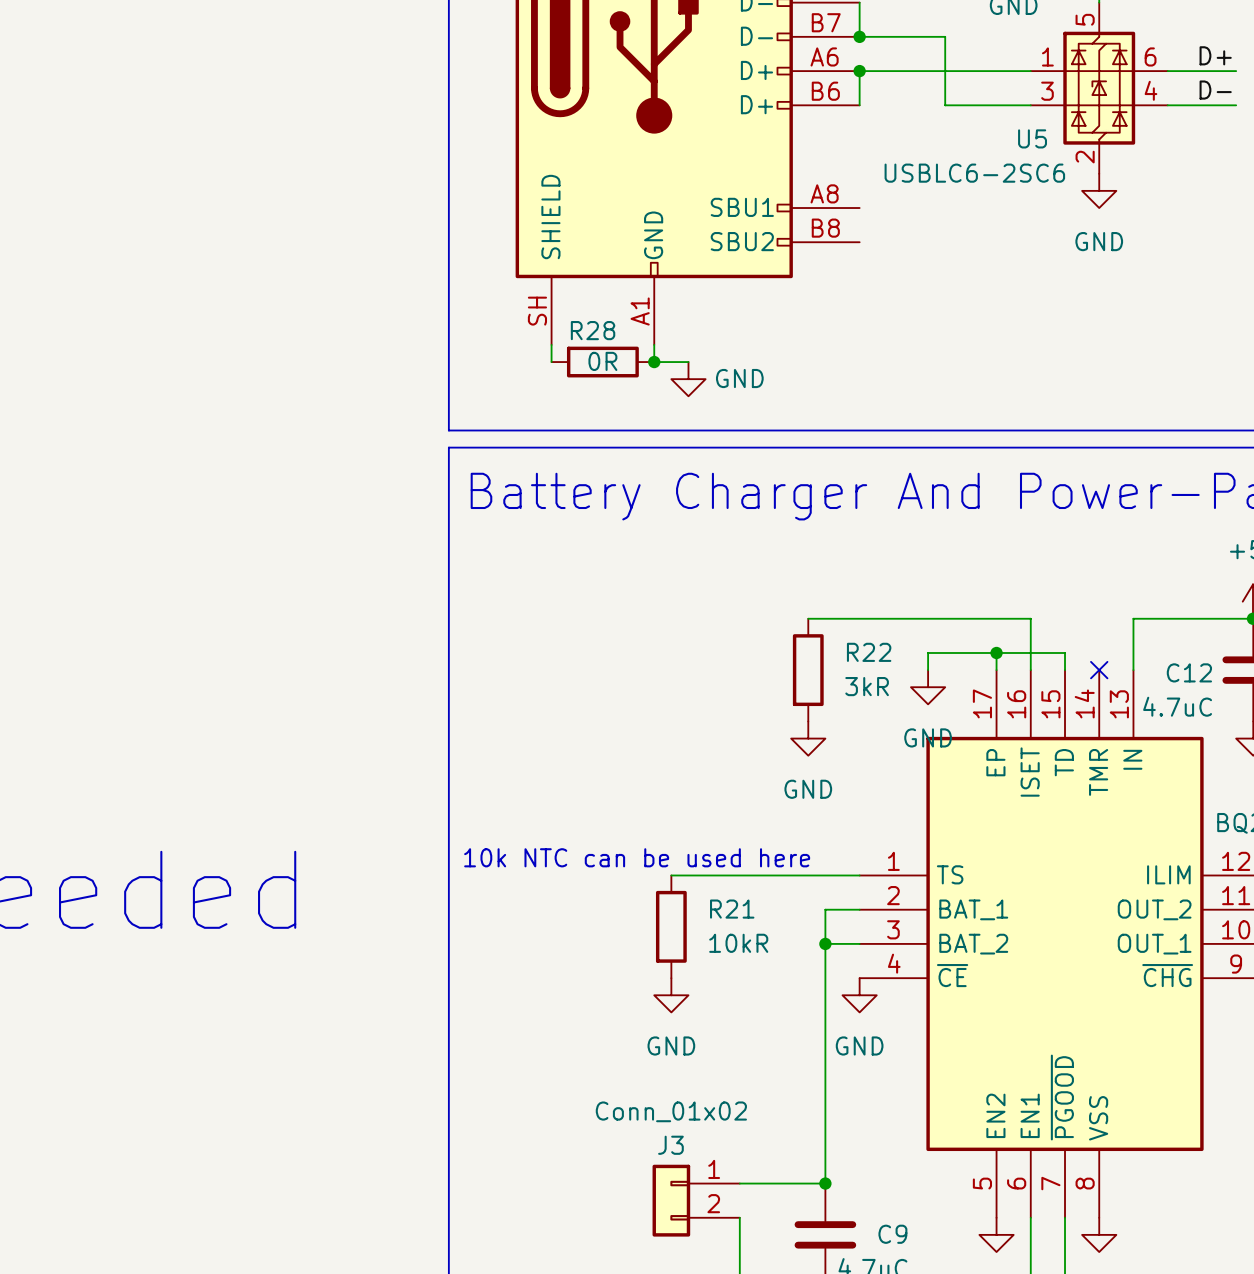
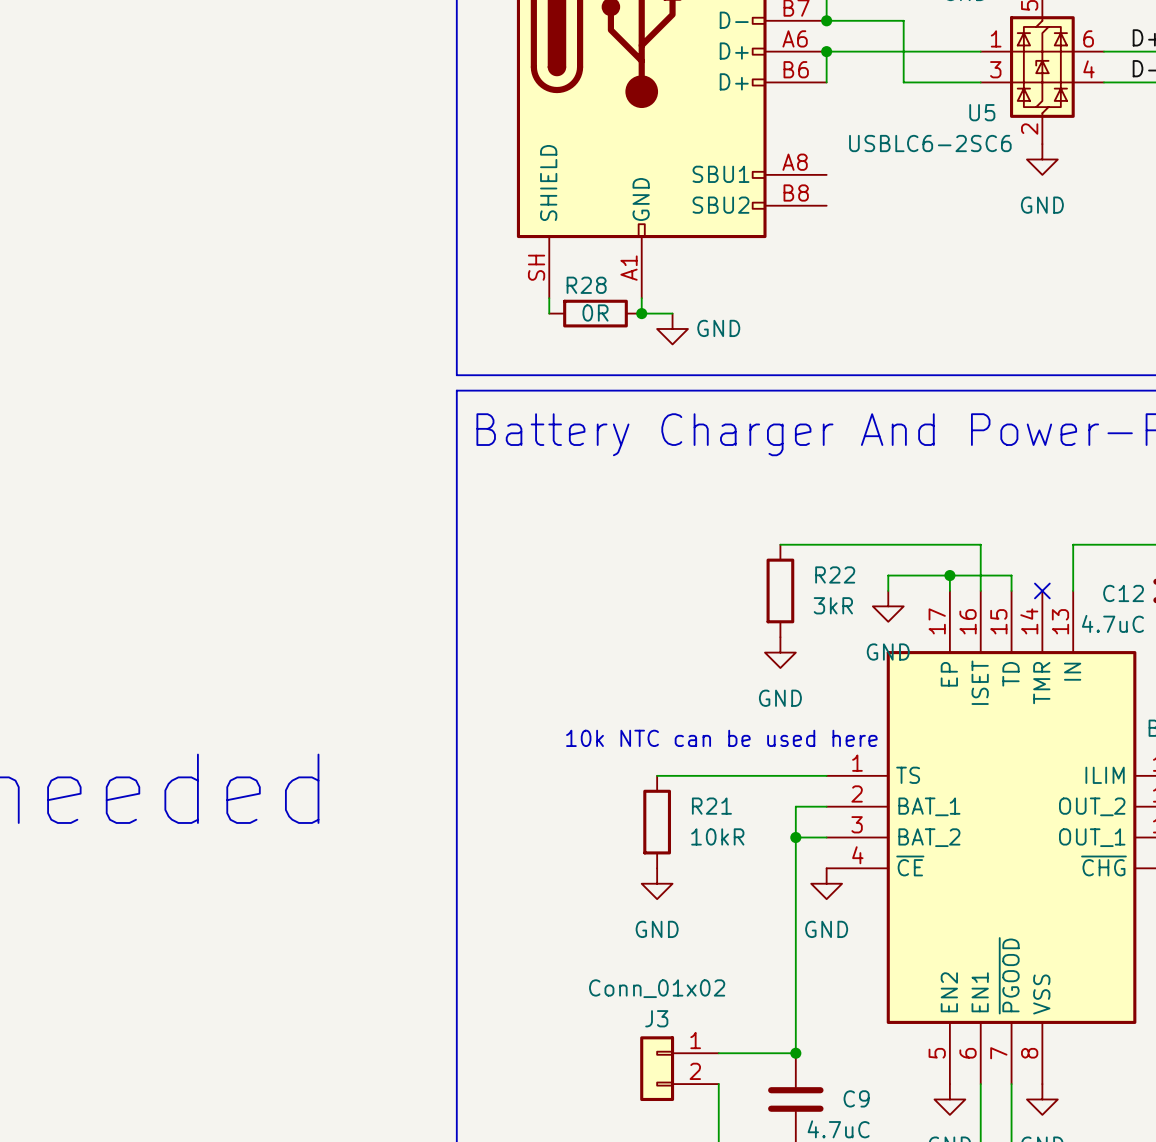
text position: 10k NTC can be used here (637, 857) -> 10k NTC can be used here (721, 738)

